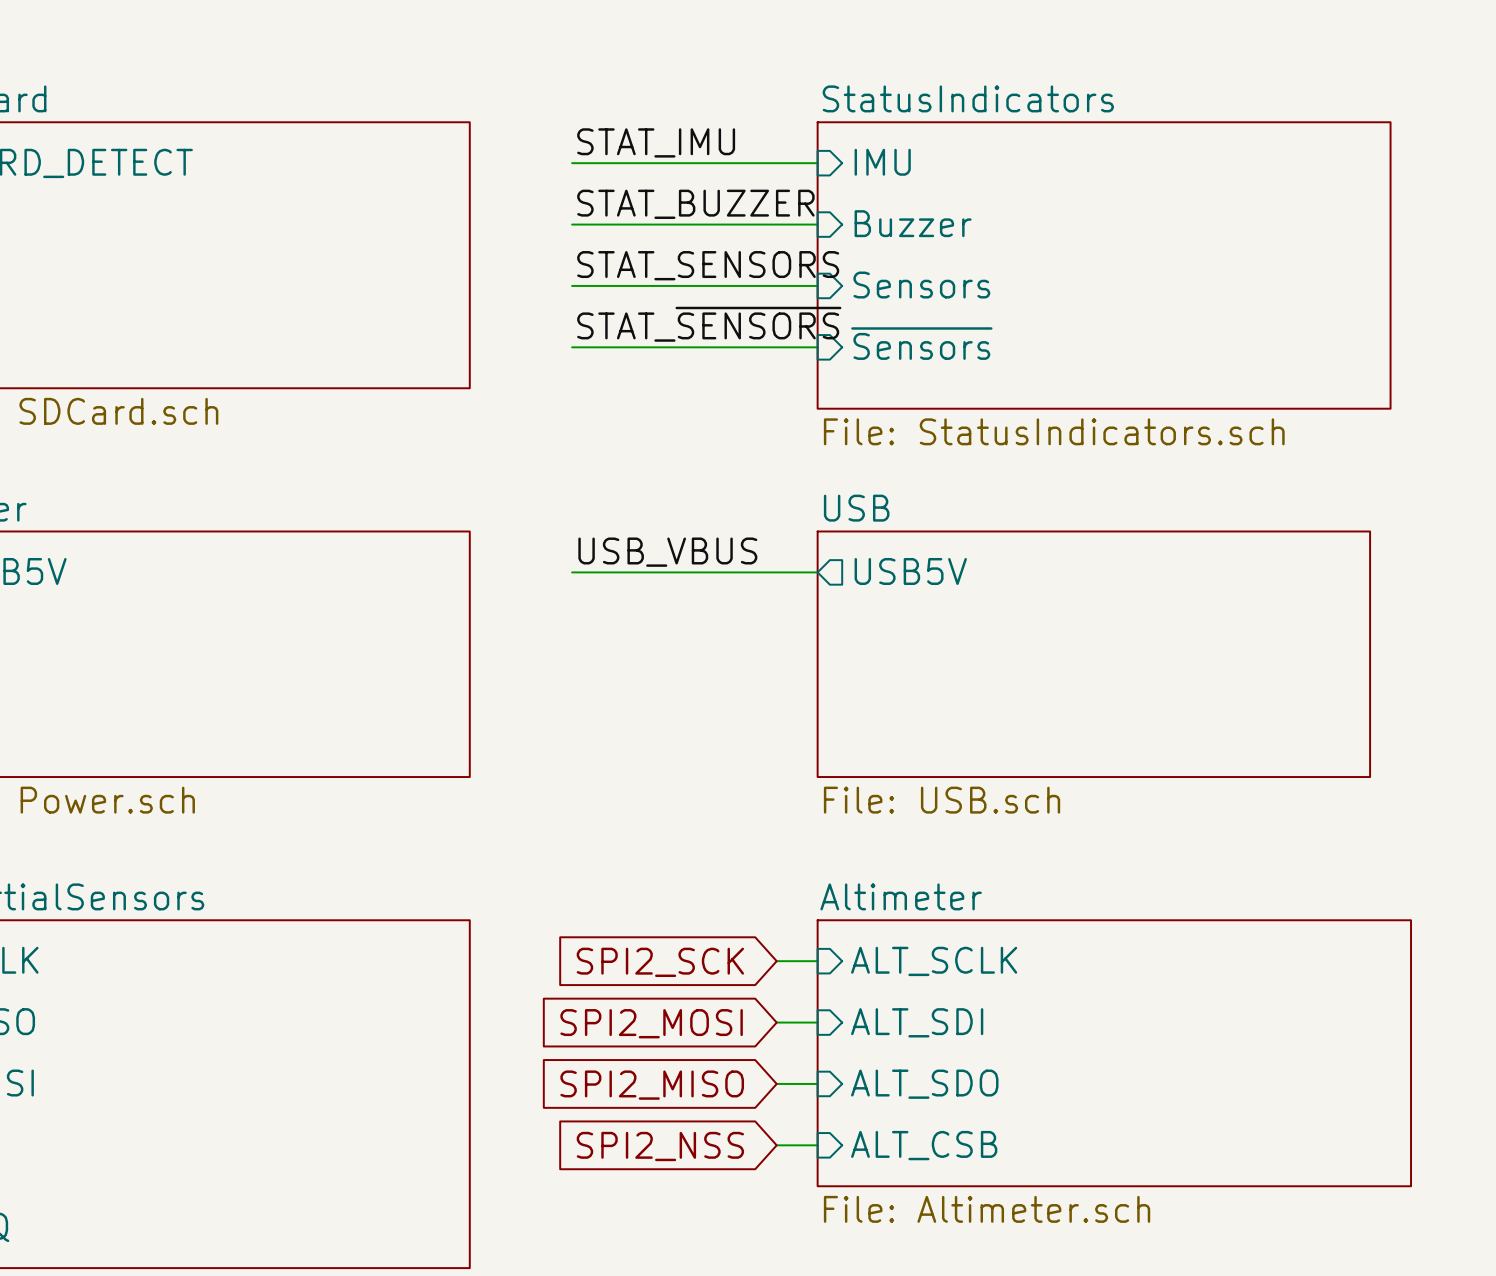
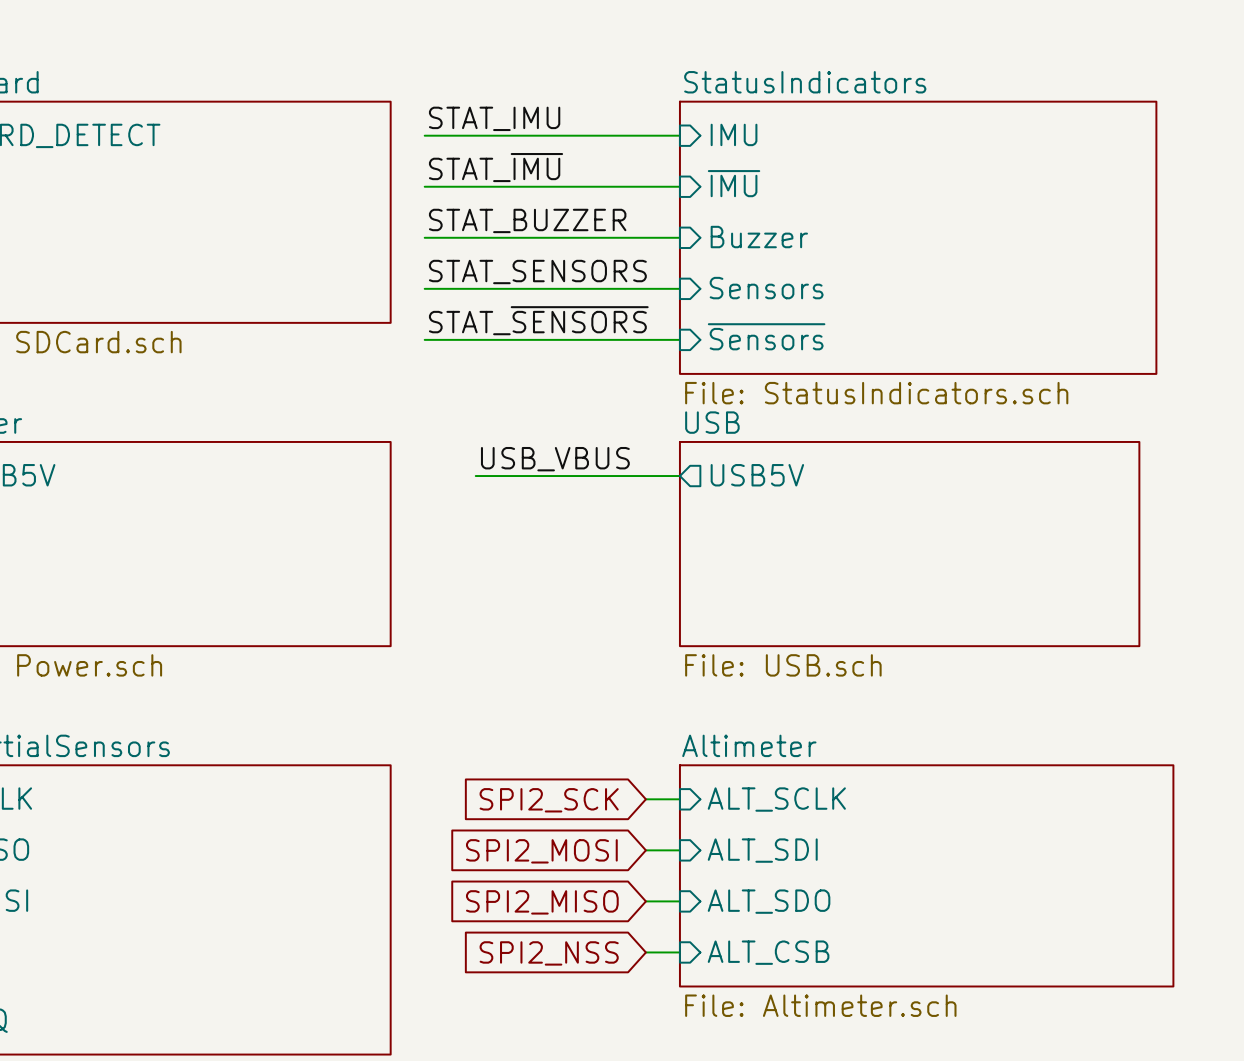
label position: STAT_IMU (656, 142) -> STAT_IMU (494, 118)
wire: none -> (424, 135) (475, 135)
label: none -> STAT_~{IMU} (496, 167)
label position: STAT_BUZZER (695, 204) -> STAT_BUZZER (527, 220)
sheet pin: Buzzer (913, 223) -> ~{IMU} (734, 183)
wire: none -> (424, 186) (475, 186)
label position: STAT_SENSORS (708, 265) -> STAT_SENSORS (537, 272)
sheet StatusIndicators: File: StatusIndicators.sch (1104, 265) -> none
wire: none -> (424, 237) (475, 237)
sheet pin: Sensors (921, 285) -> Buzzer (759, 237)
sheet StatusIndicators: none -> File: StatusIndicators.sch (918, 237)
label position: STAT_~{SENSORS} (709, 324) -> STAT_~{SENSORS} (538, 320)
sheet pin: ~{Sensors} (921, 343) -> Sensors (766, 288)
wire: none -> (424, 288) (475, 288)
sheet pin: none -> ~{Sensors} (766, 336)
wire: none -> (424, 339) (679, 339)

